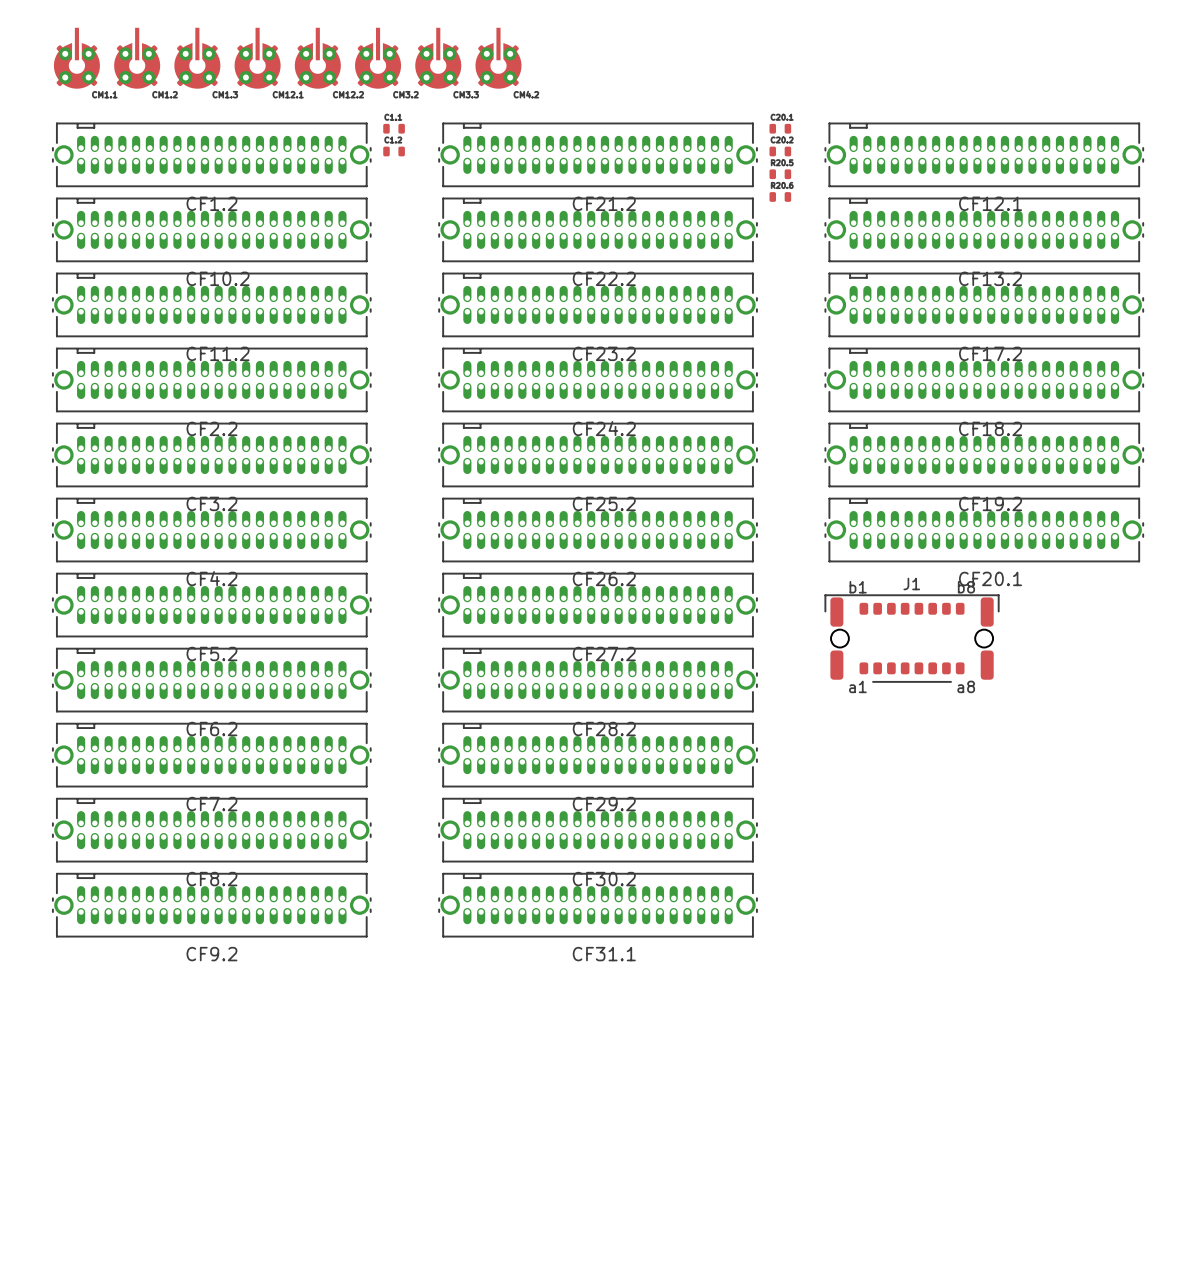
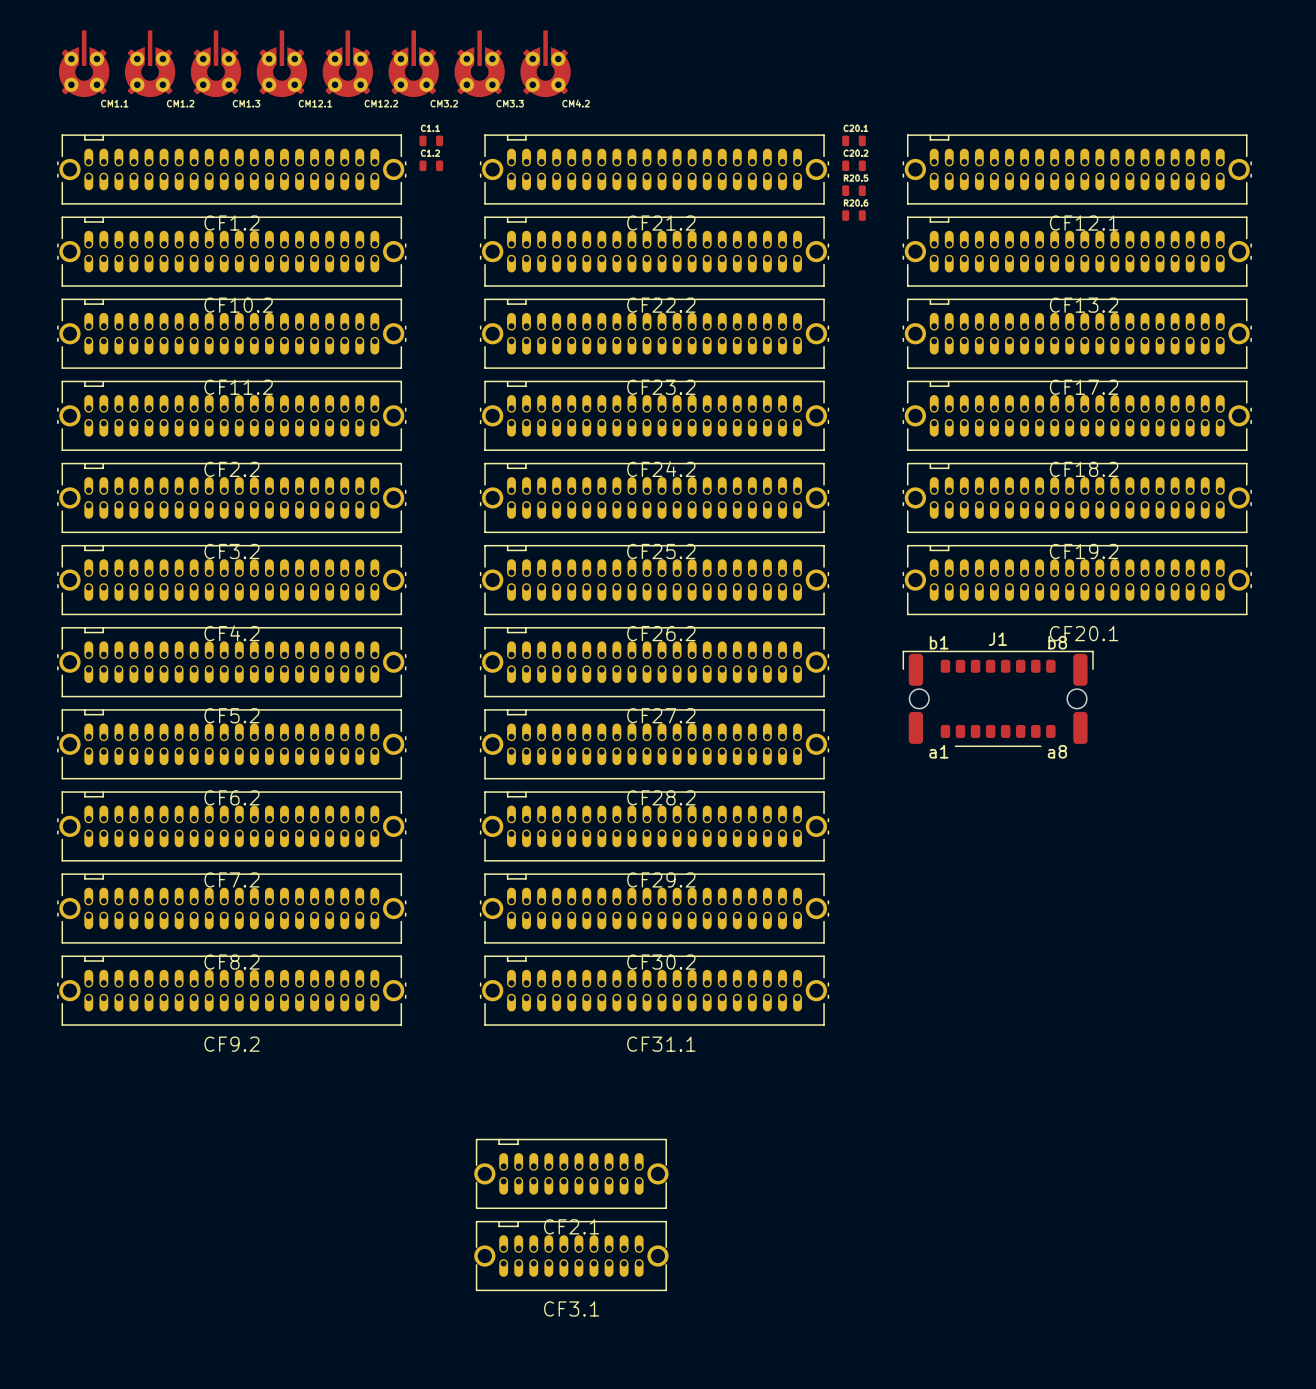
CF2.1: none -> (571, 1173)
CF3.1: none -> (571, 1256)

